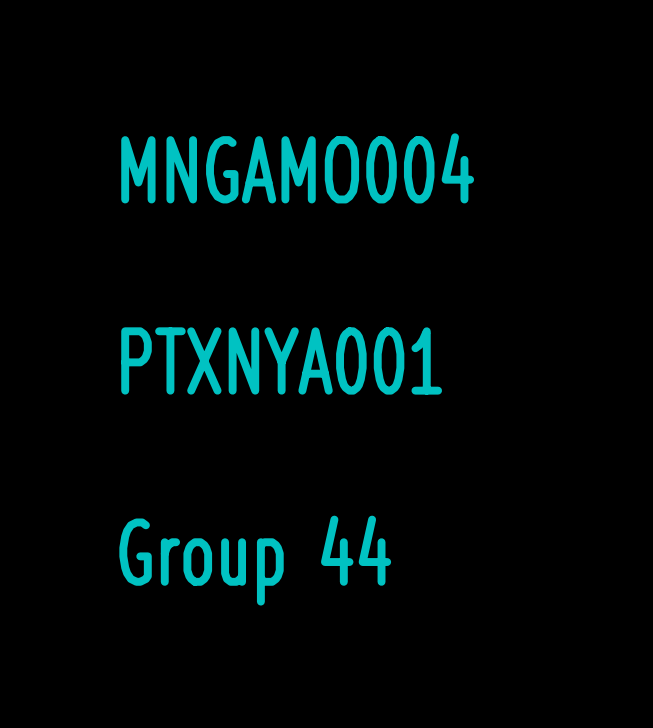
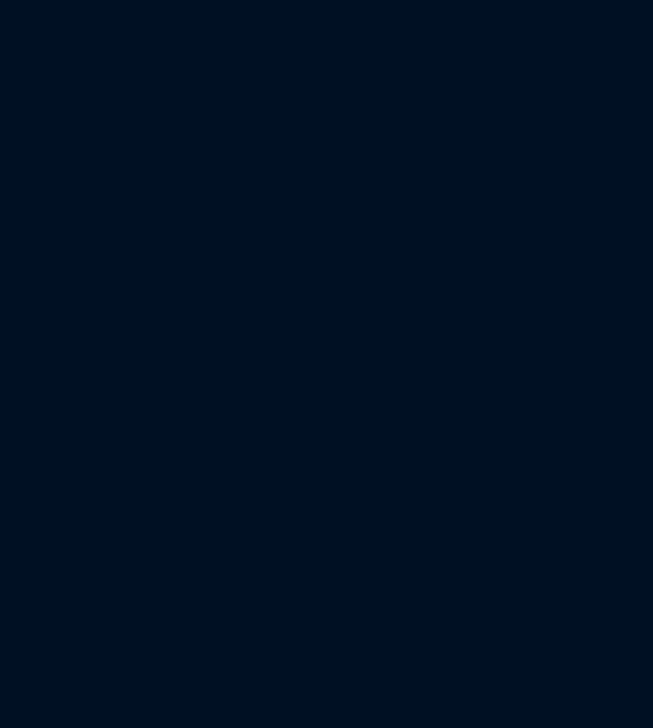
text: MNGAMO004 (297, 168) -> none
text: PTXNYA001 (281, 360) -> none
text: Group 44 (255, 560) -> none

